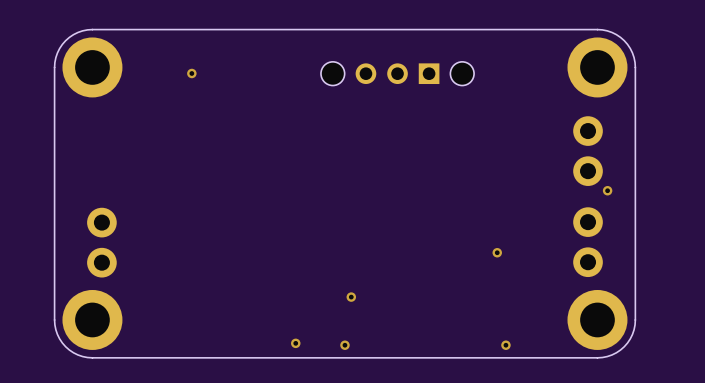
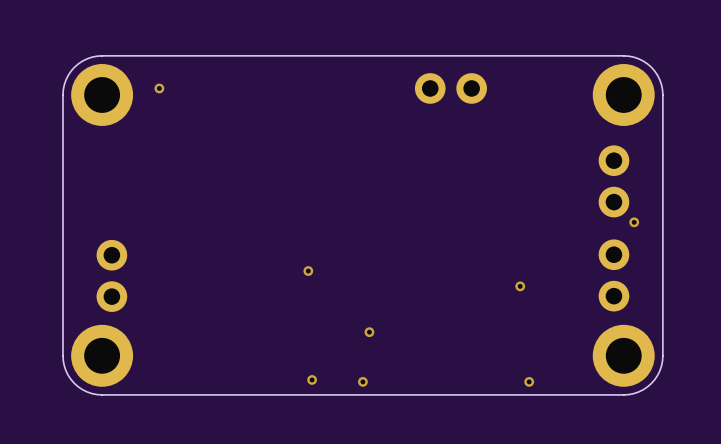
part: none -> (450, 88)
via position: (191, 73) -> (159, 88)
part: (397, 73) -> none
via: none -> (308, 271)

